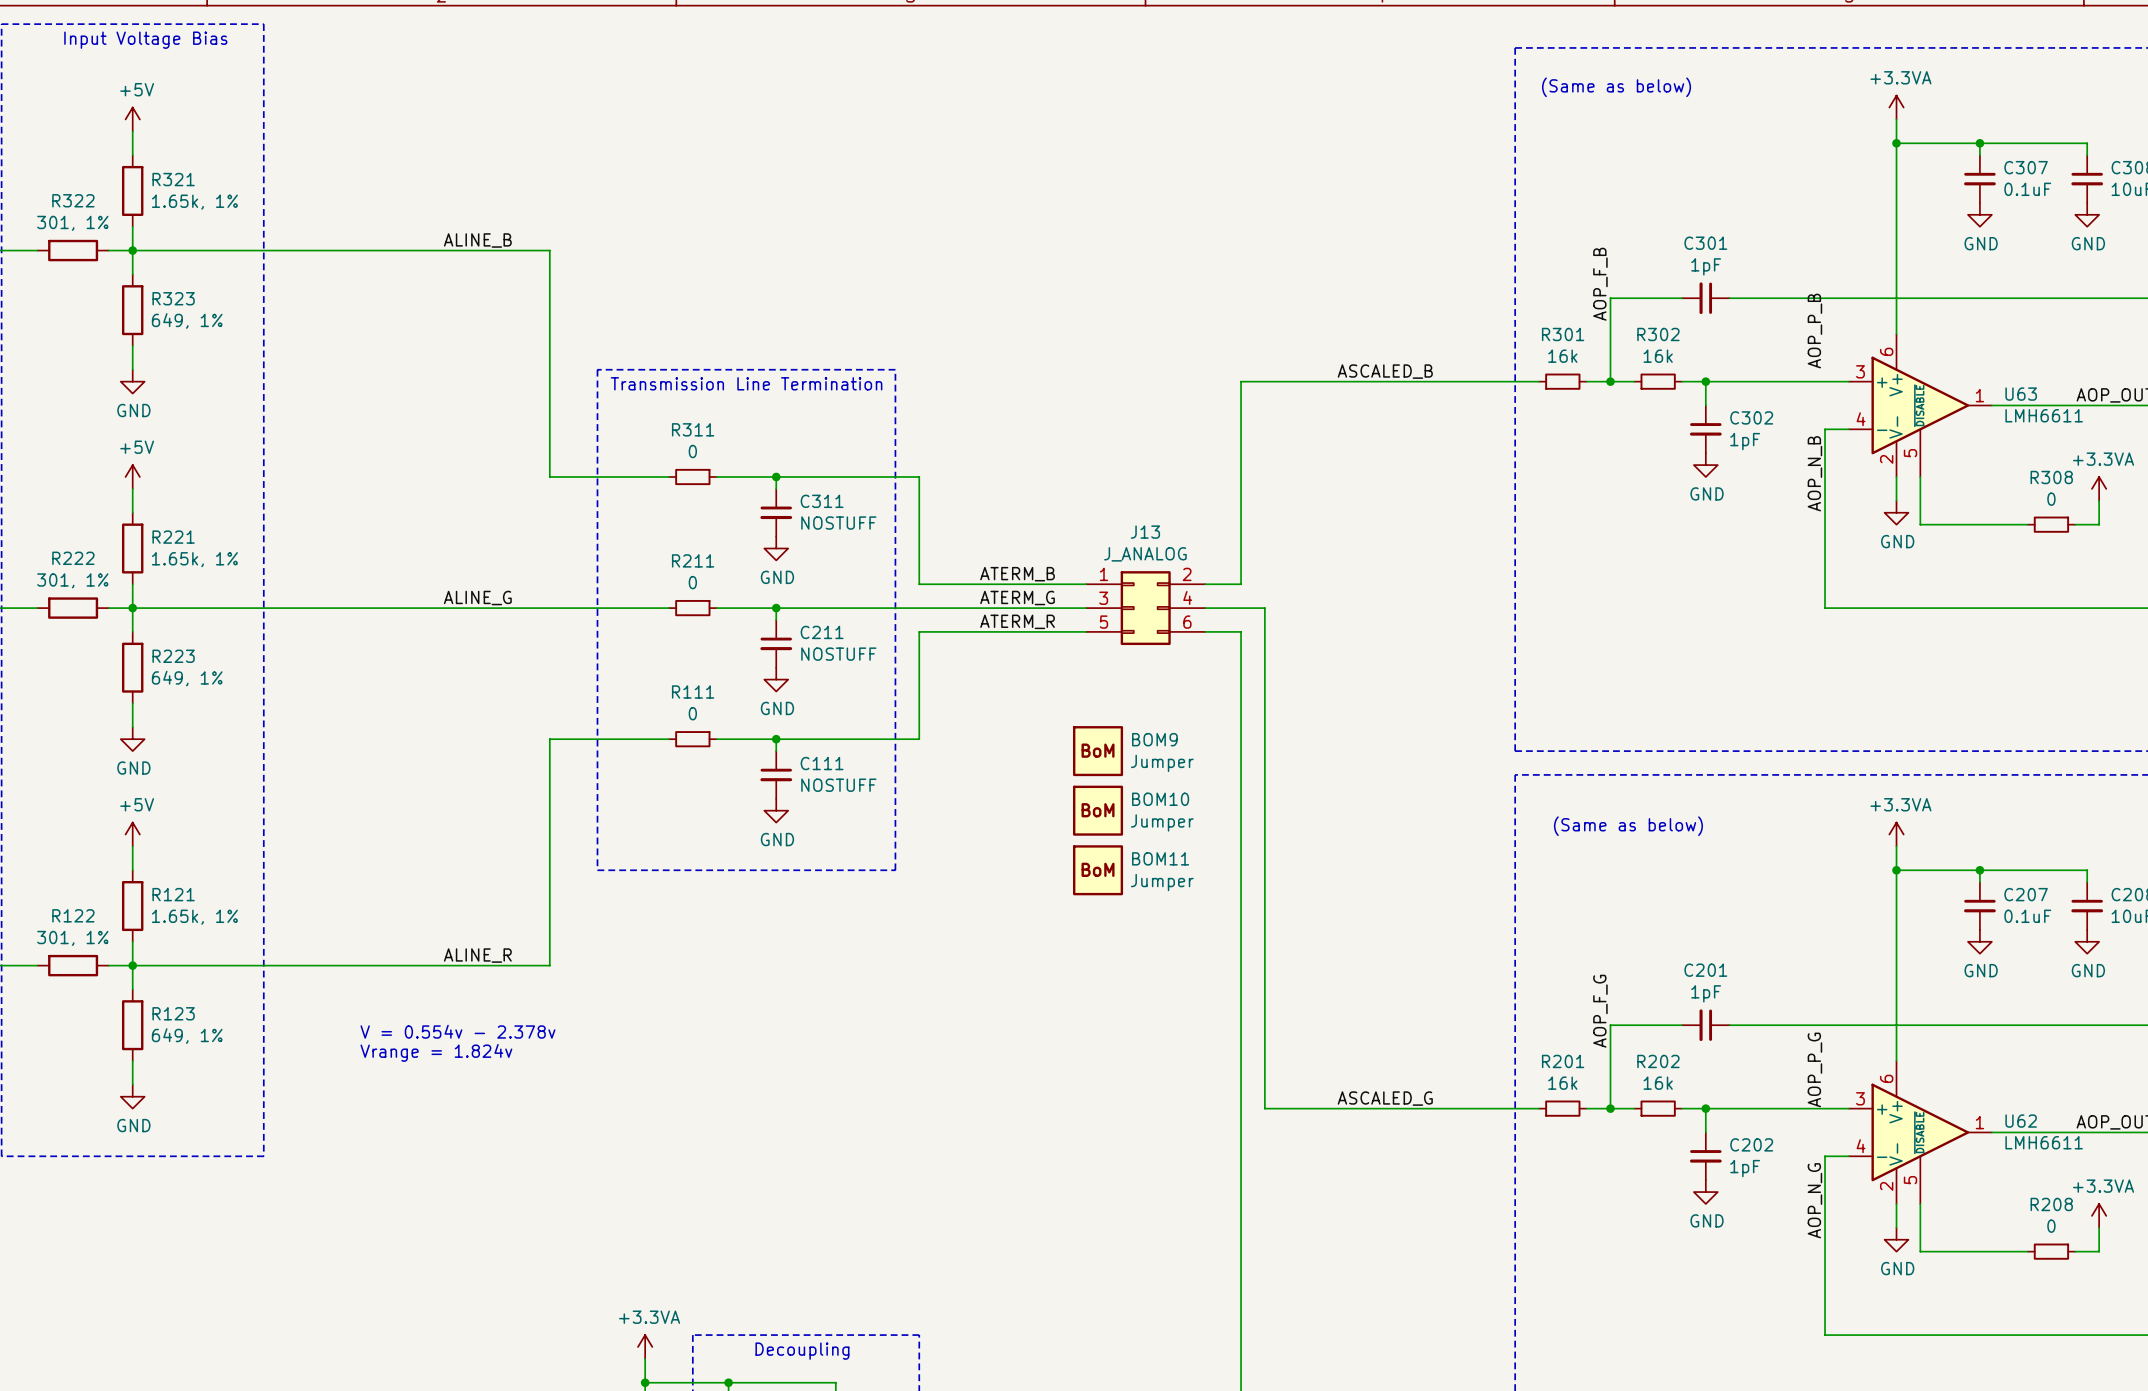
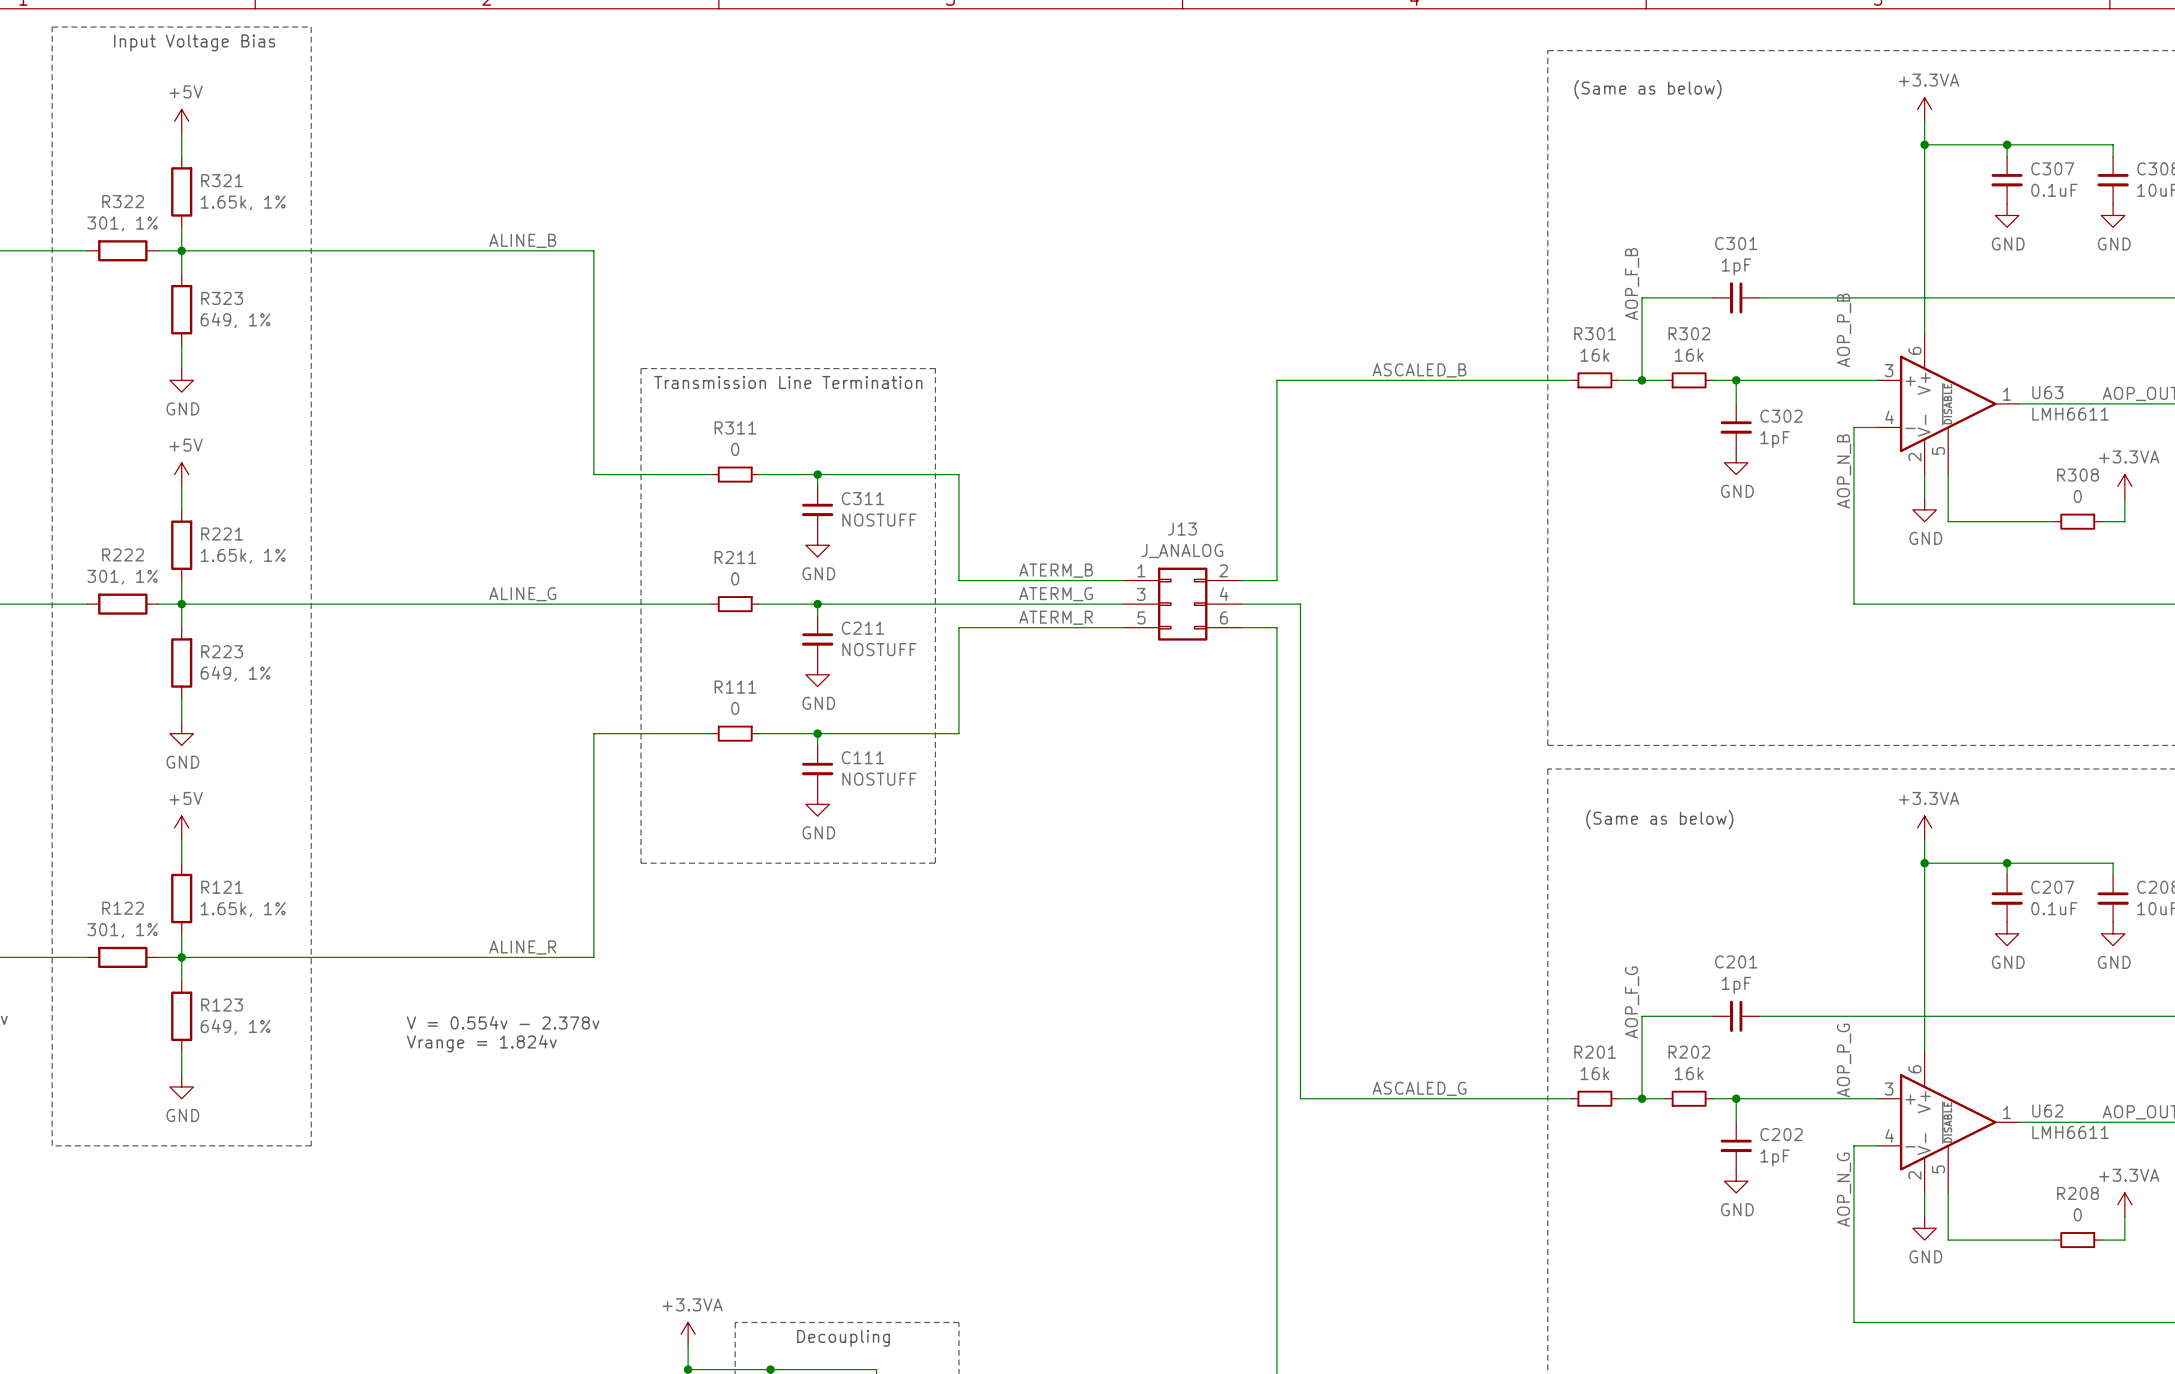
BOM9: Jumper (1098, 751) -> none
BOM10: Jumper (1098, 810) -> none
BOM11: Jumper (1098, 870) -> none

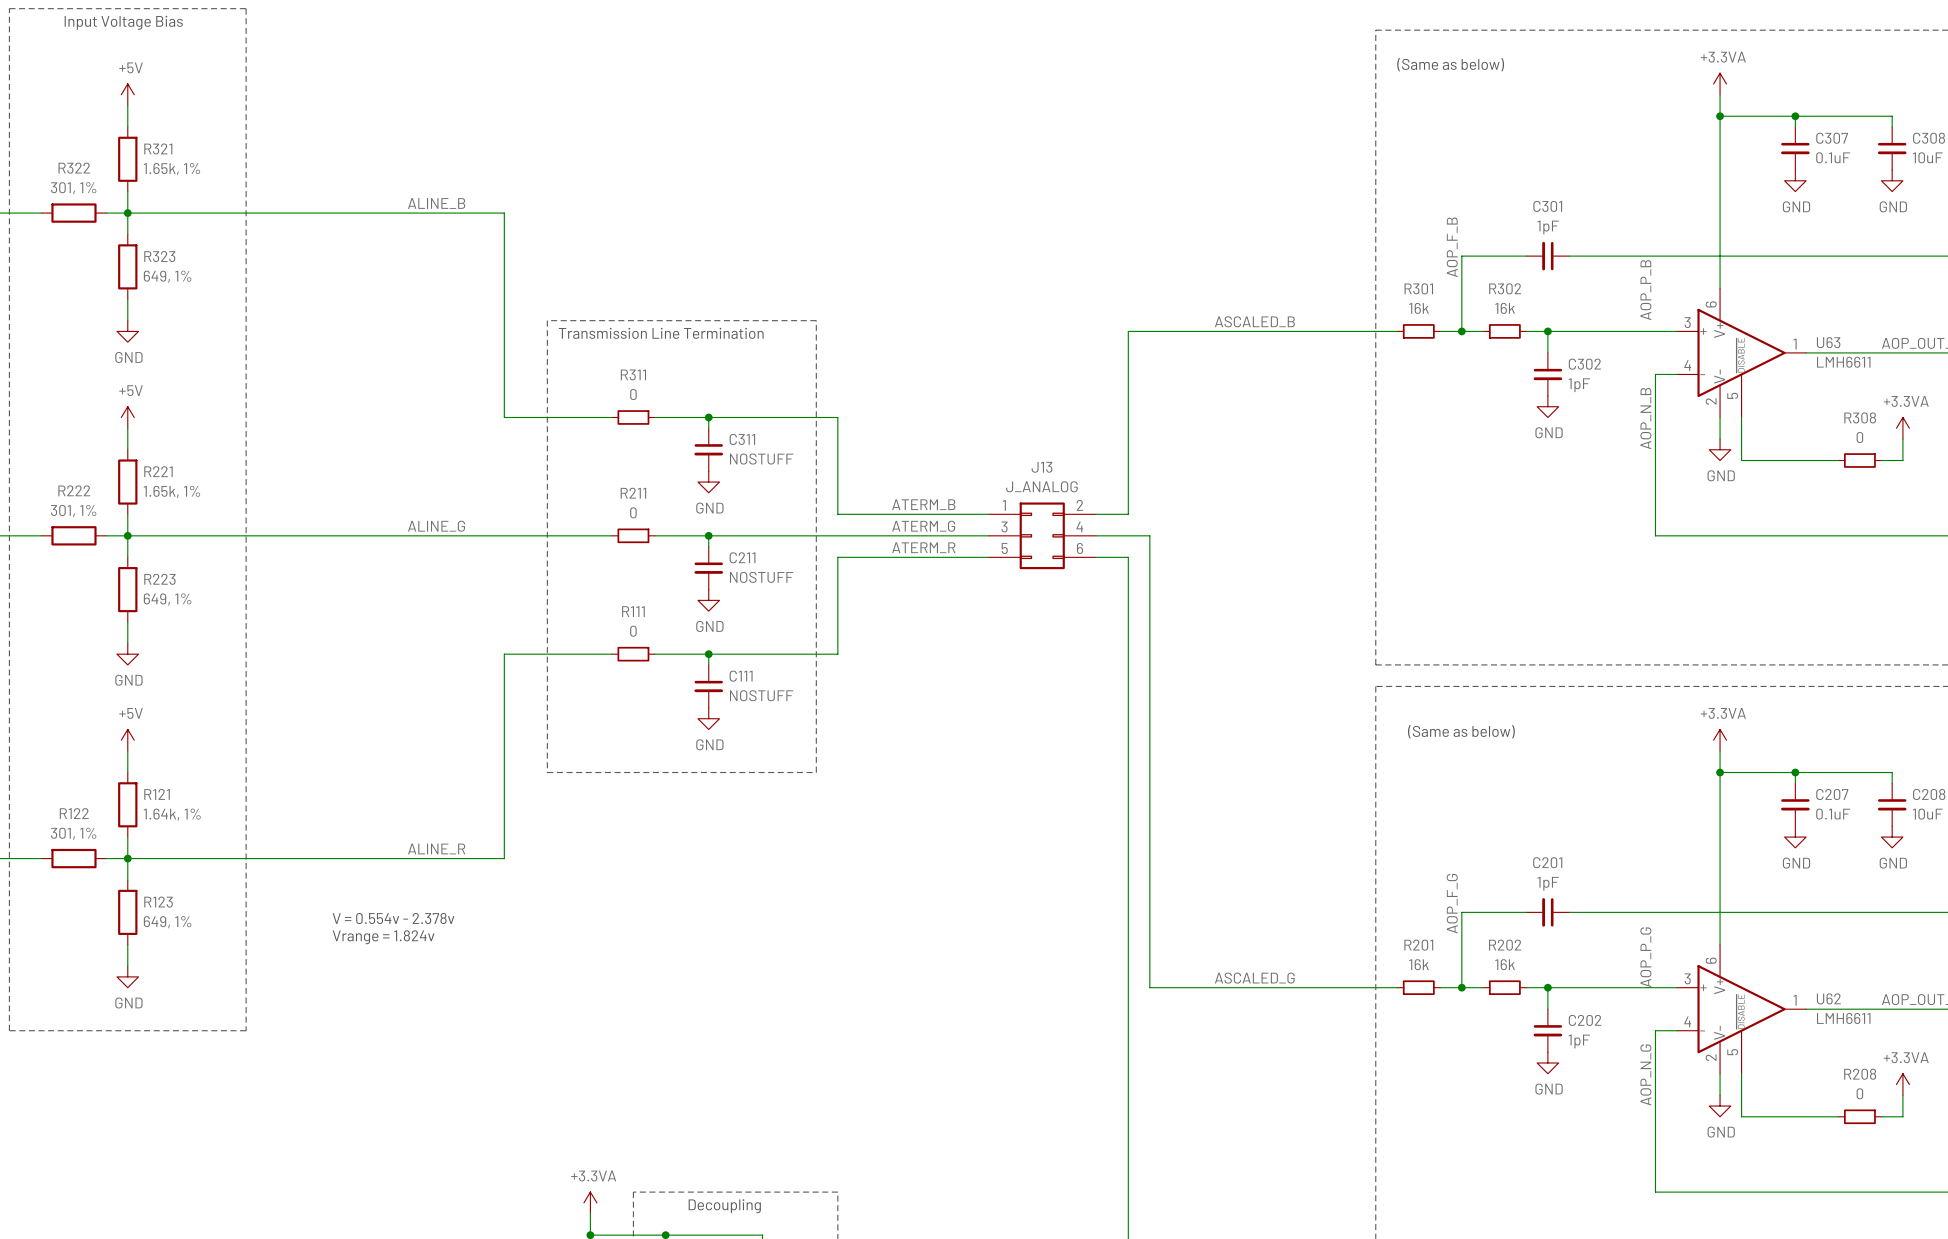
R121 value: 1.65k, 1% (243, 909) -> 1.64k, 1% (172, 814)

